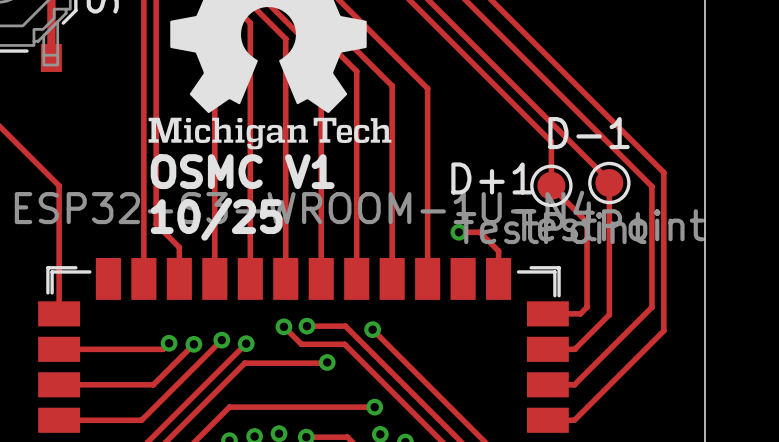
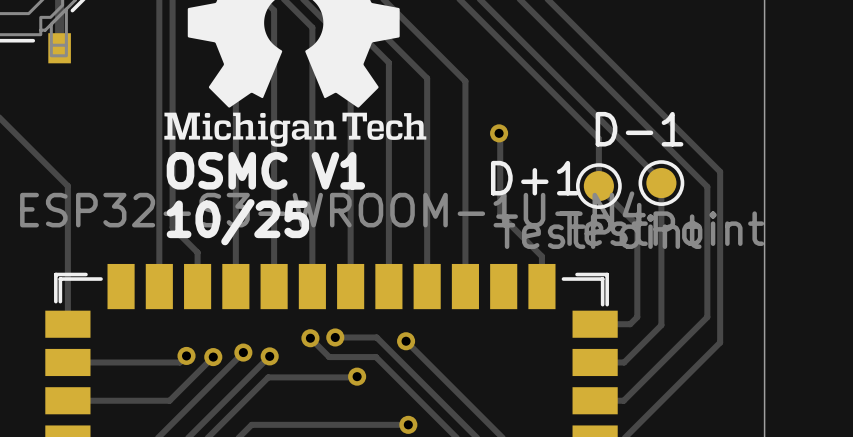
track: (458, 232) (479, 232) -> (499, 133) (500, 214) (521, 236)
via position: (458, 232) -> (499, 133)

